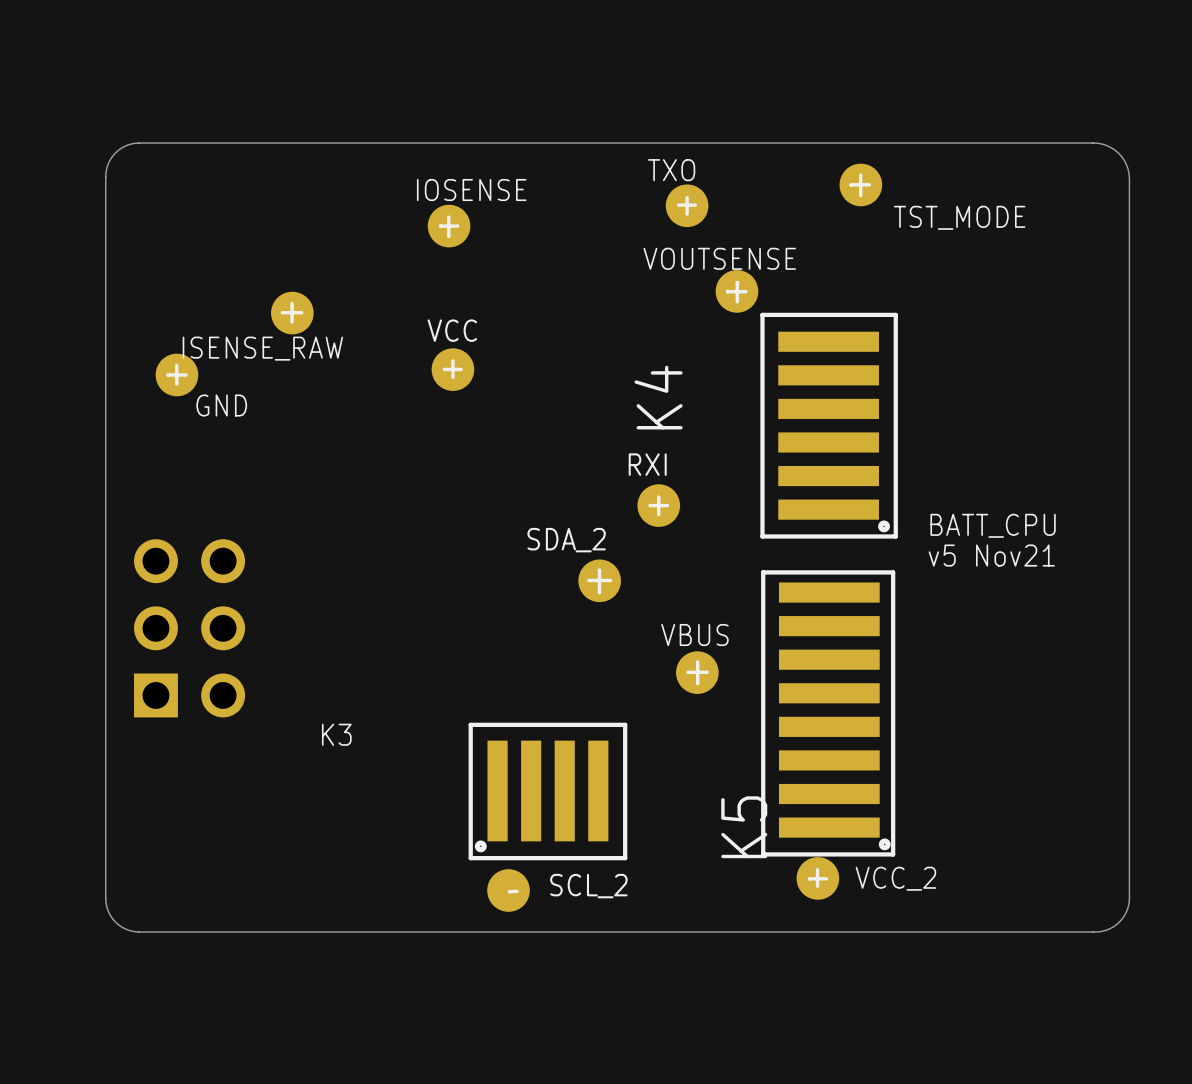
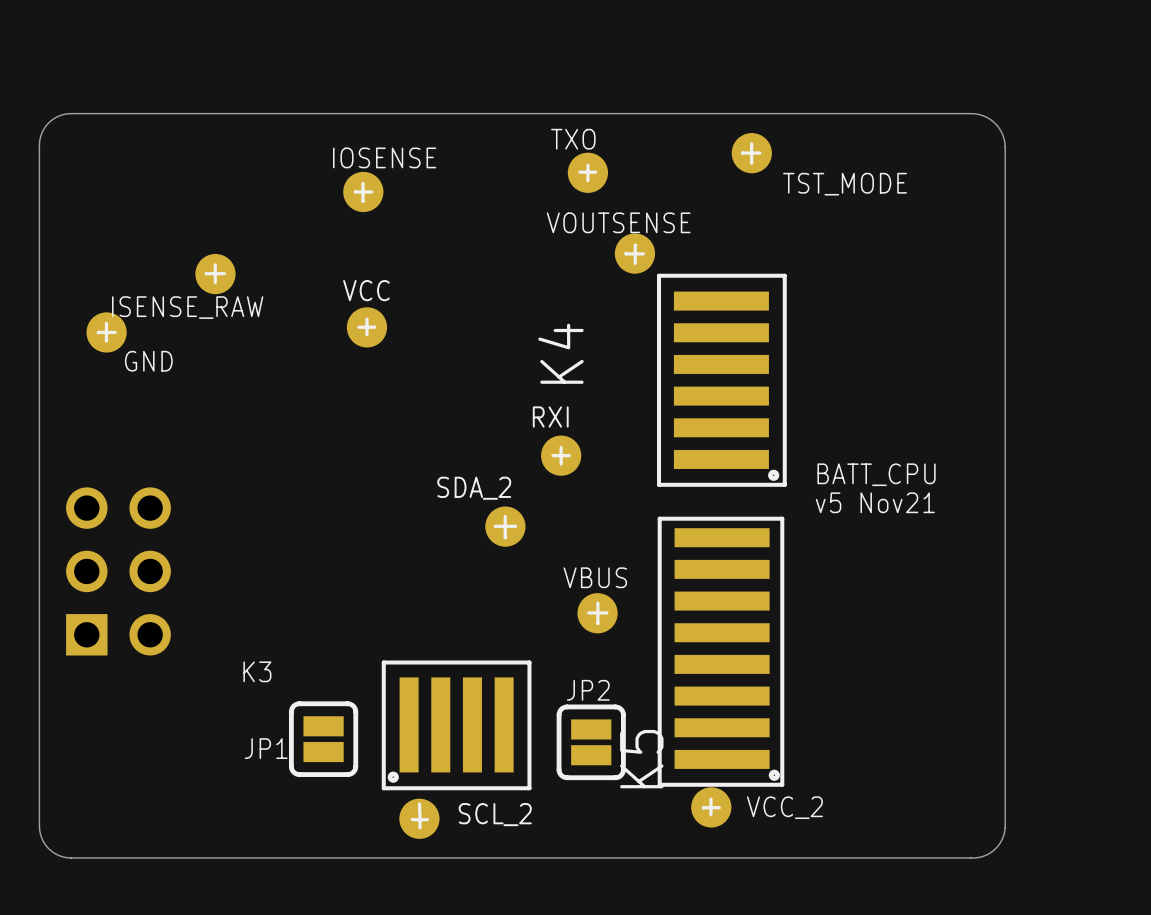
JP1: none -> (323, 739)
JP2: none -> (591, 742)
line: none -> (419, 803) (420, 819)
line: none -> (412, 819) (420, 819)
line: none -> (420, 819) (420, 827)

